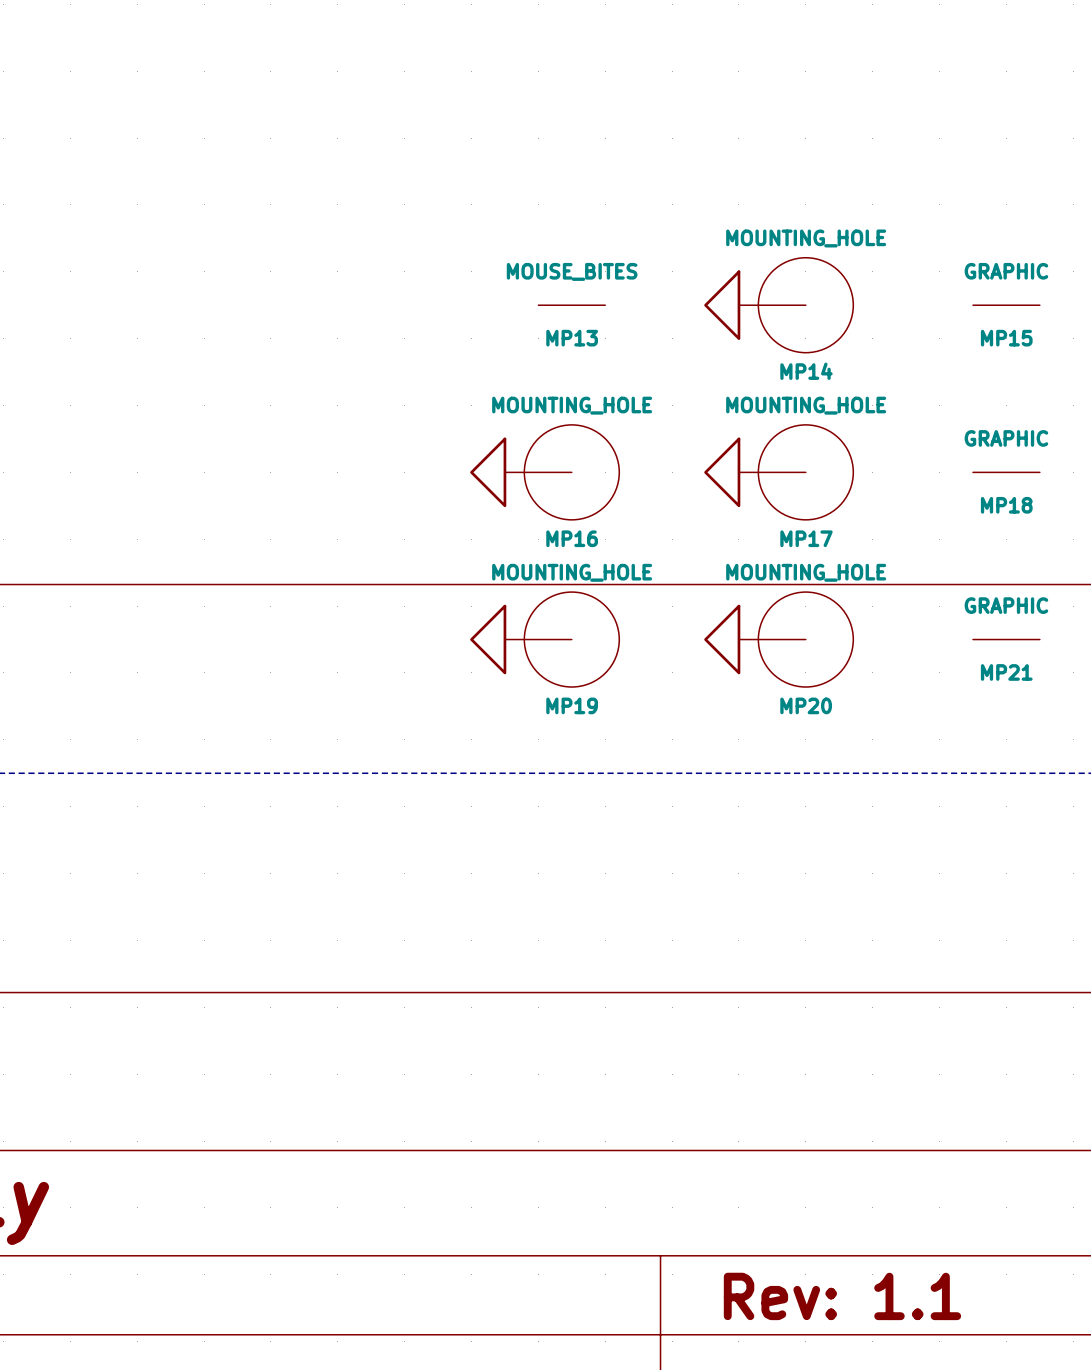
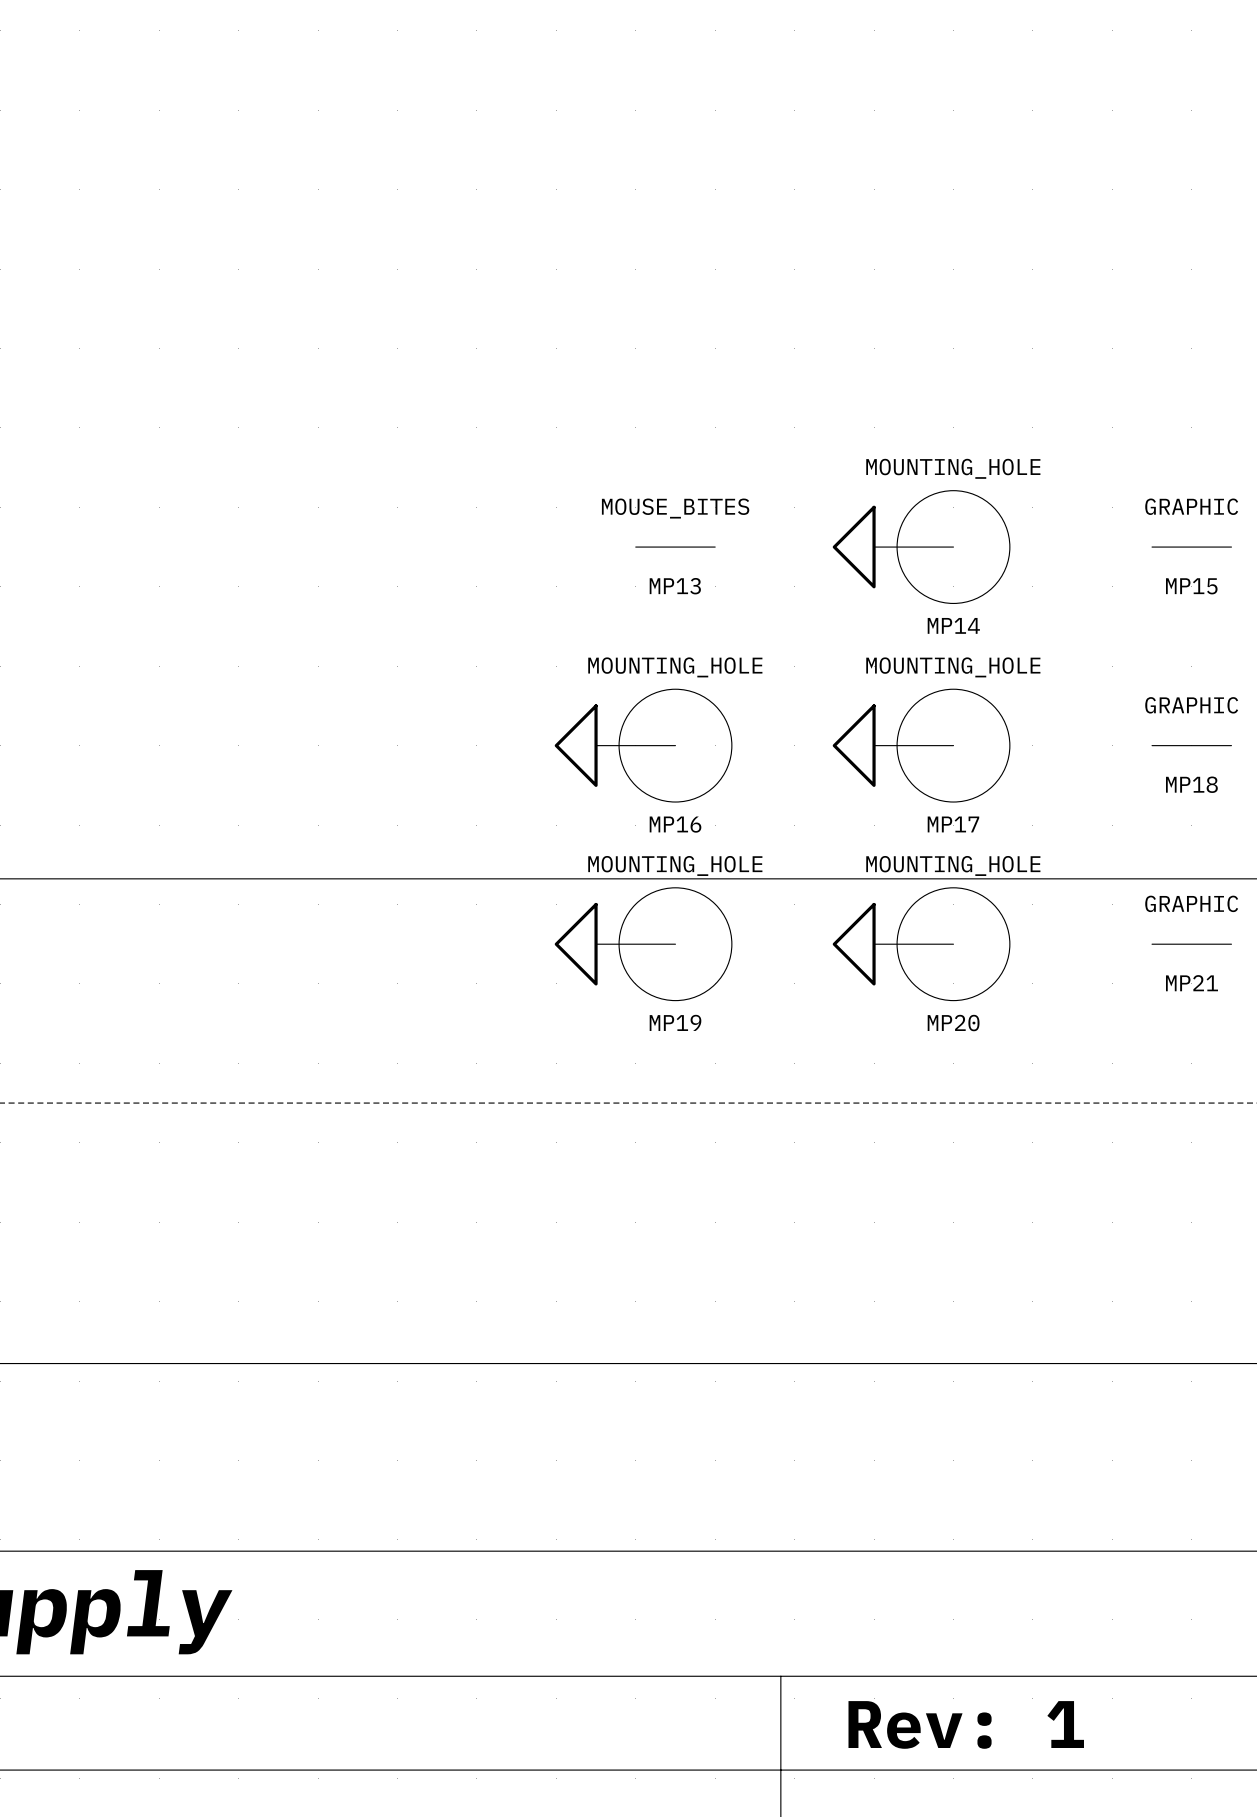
title block: Rev: 1.1 (842, 1296) -> Rev: 1 (966, 1724)

